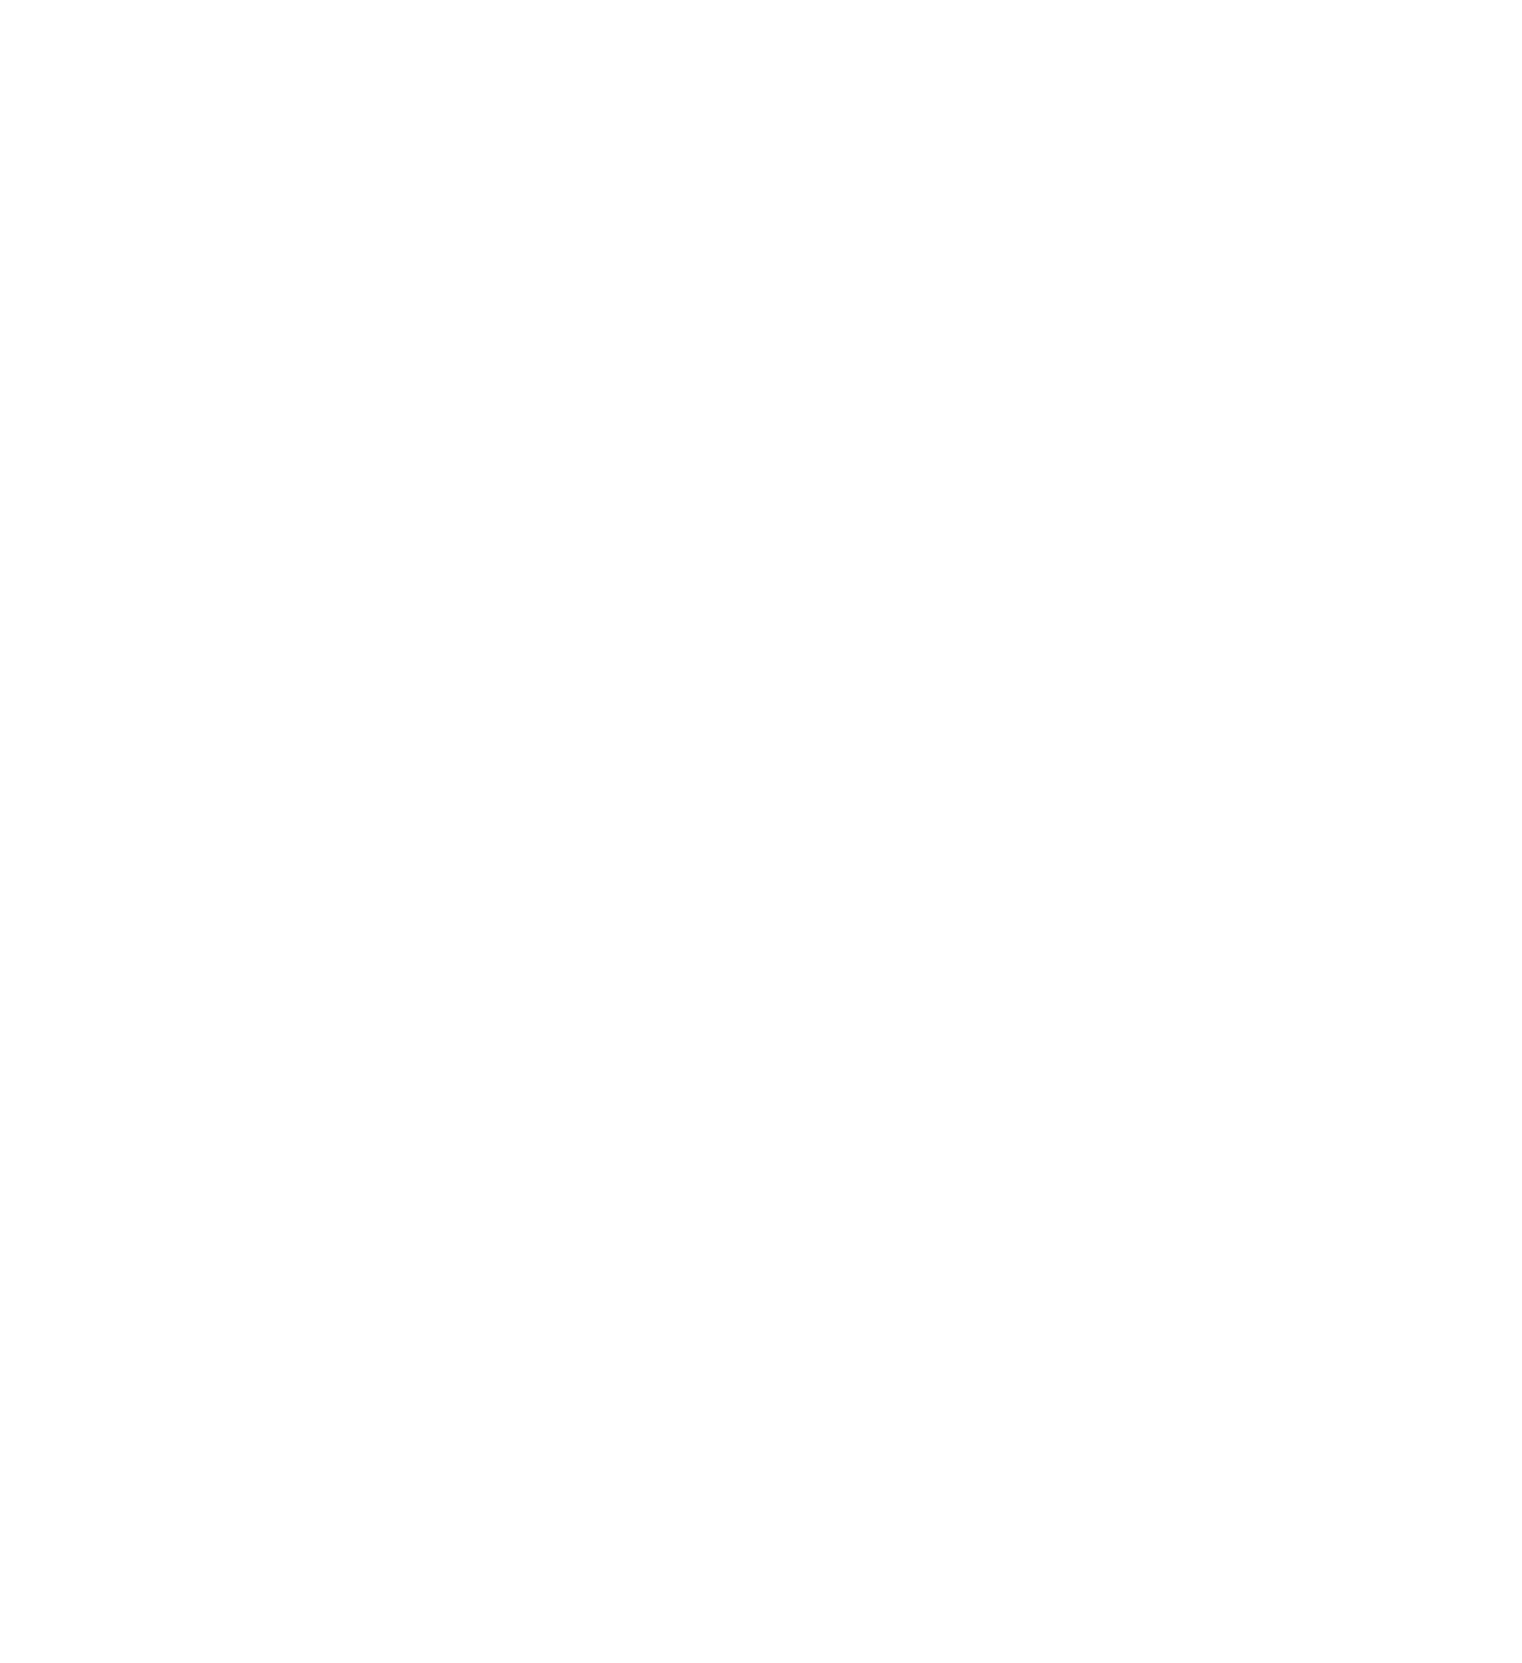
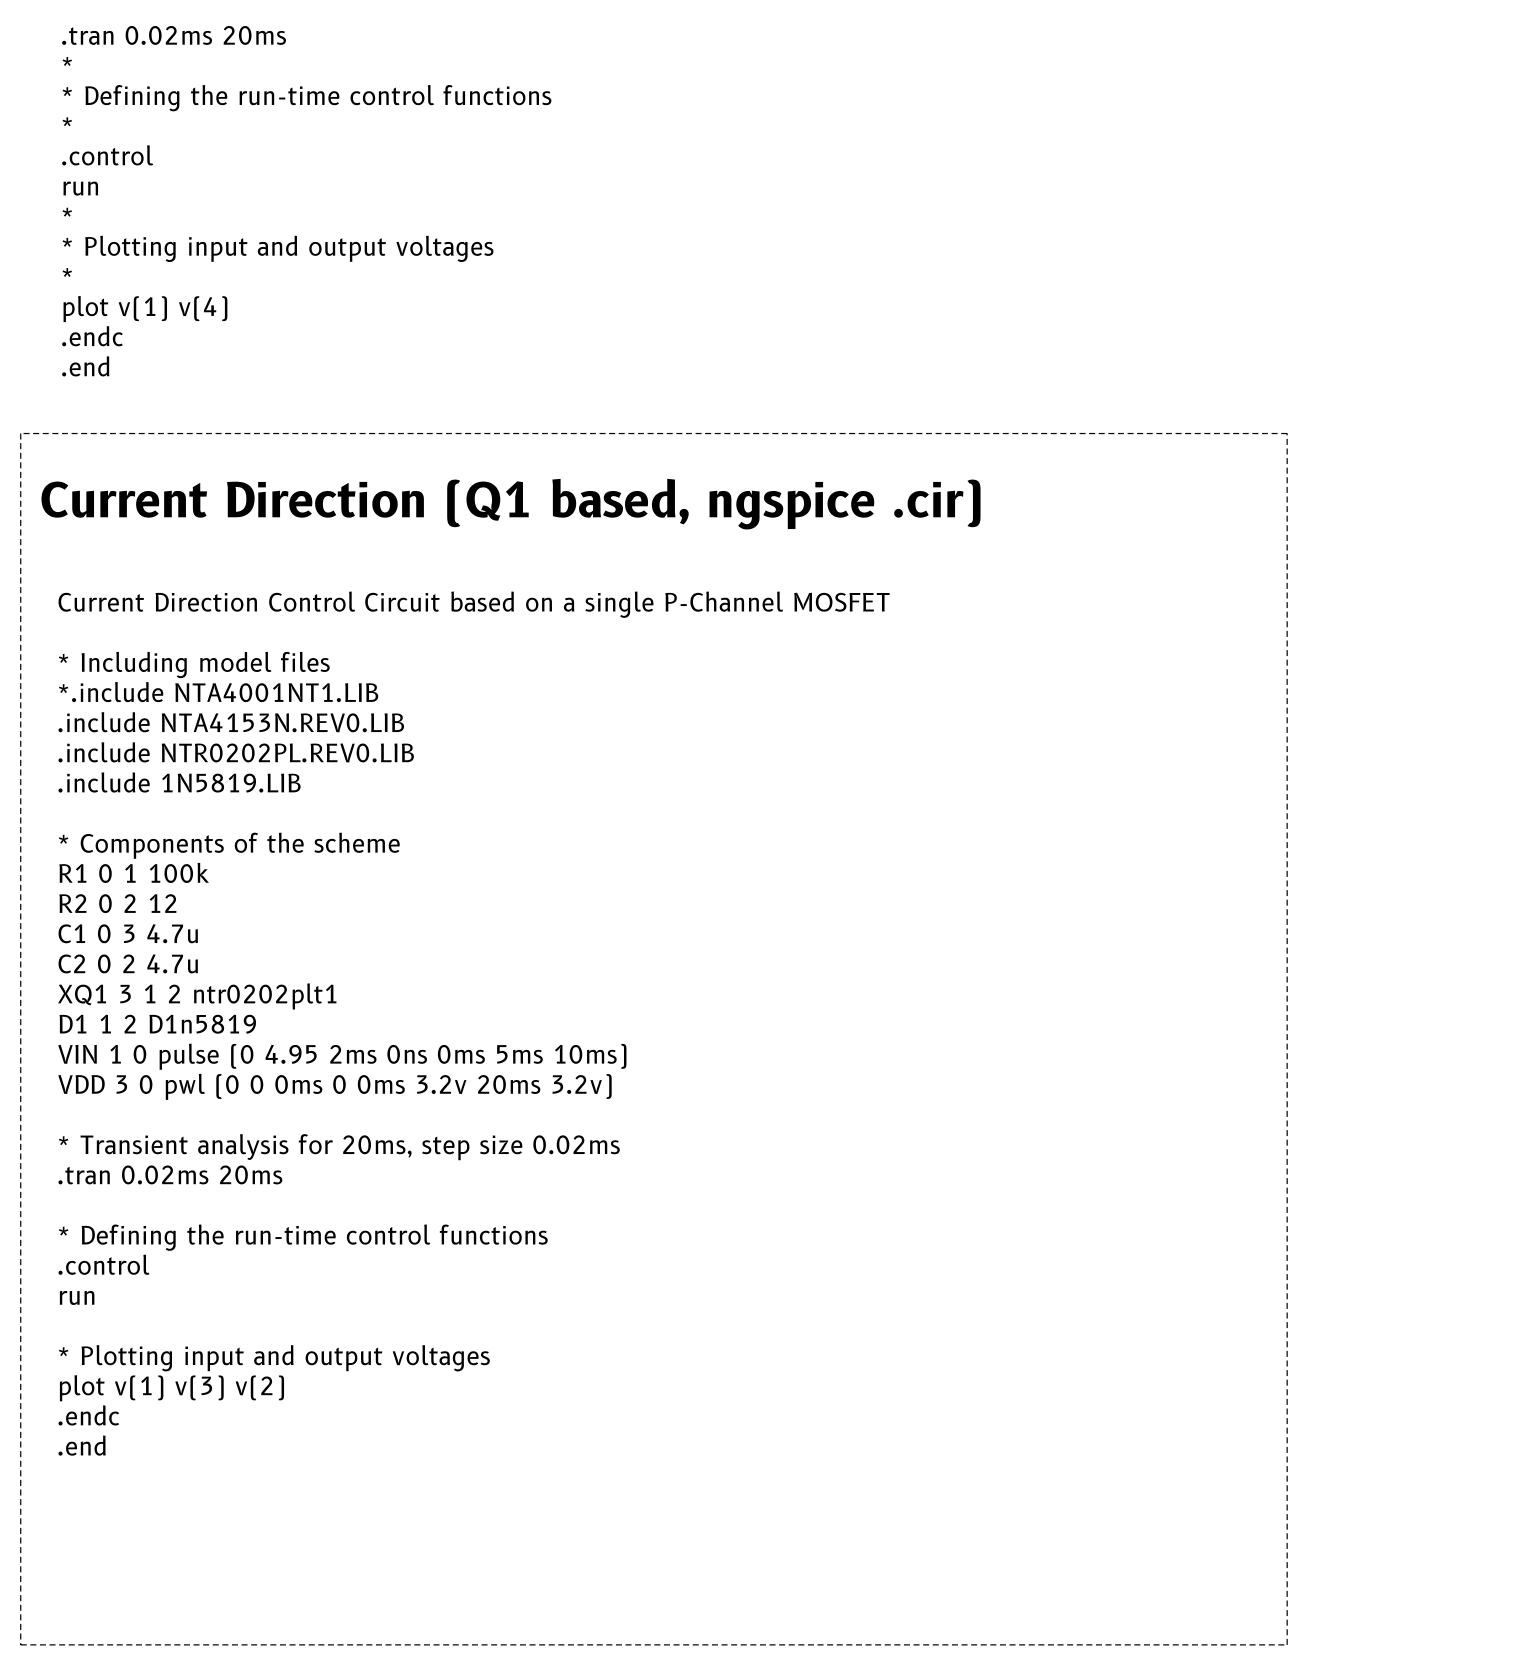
text: none -> .tran 0.02ms 20ms (174, 35)
text: none -> * (67, 61)
text: none -> * Defining the run-time control functions (307, 98)
text: none -> * (67, 121)
text: none -> .control (107, 155)
text: none -> run (80, 188)
text: none -> * (67, 212)
text: none -> * Plotting input and output voltages (278, 248)
text: none -> * (67, 272)
text: none -> plot v(1) v(4) (145, 309)
text: none -> .endc (92, 336)
text: none -> .end (85, 366)
line: none -> (20, 433) (1287, 433) (1287, 1644) (20, 1644) (20, 433)
text: none -> Current Direction (Q1 based, ngspice .cir) (510, 504)
text: none -> Current Direction Control Circuit based on a single P-Channel MOSFET (474, 604)
text: none -> * Including model files (194, 664)
text: none -> *.include NTA4001NT1.LIB (218, 692)
text: none -> .include NTA4153N.REV0.LIB (231, 722)
text: none -> .include NTR0202PL.REV0.LIB (236, 752)
text: none -> .include 1N5819.LIB (179, 782)
text: none -> * Components of the scheme (229, 845)
text: none -> R1 0 1 100k (134, 872)
text: none -> R2 0 2 12 (117, 903)
text: none -> C1 0 3 4.7u (128, 933)
text: none -> C2 0 2 4.7u (128, 963)
text: none -> XQ1 3 1 2 ntr0202plt1 (197, 996)
text: none -> D1 1 2 D1n5819 (157, 1024)
text: none -> VIN 1 0 pulse (0 4.95 2ms 0ns 0ms 5ms 10ms) (342, 1056)
text: none -> VDD 3 0 pwl (0 0 0ms 0 0ms 3.2v 20ms 3.2v) (334, 1086)
text: none -> * Transient analysis for 20ms, step size 0.02ms (339, 1147)
text: none -> .tran 0.02ms 20ms (170, 1174)
text: none -> * Defining the run-time control functions (303, 1237)
text: none -> .control (103, 1264)
text: none -> run (77, 1297)
text: none -> * Plotting input and output voltages (274, 1358)
text: none -> plot v(1) v(3) v(2) (171, 1388)
text: none -> .endc (88, 1415)
text: none -> .end (82, 1445)

